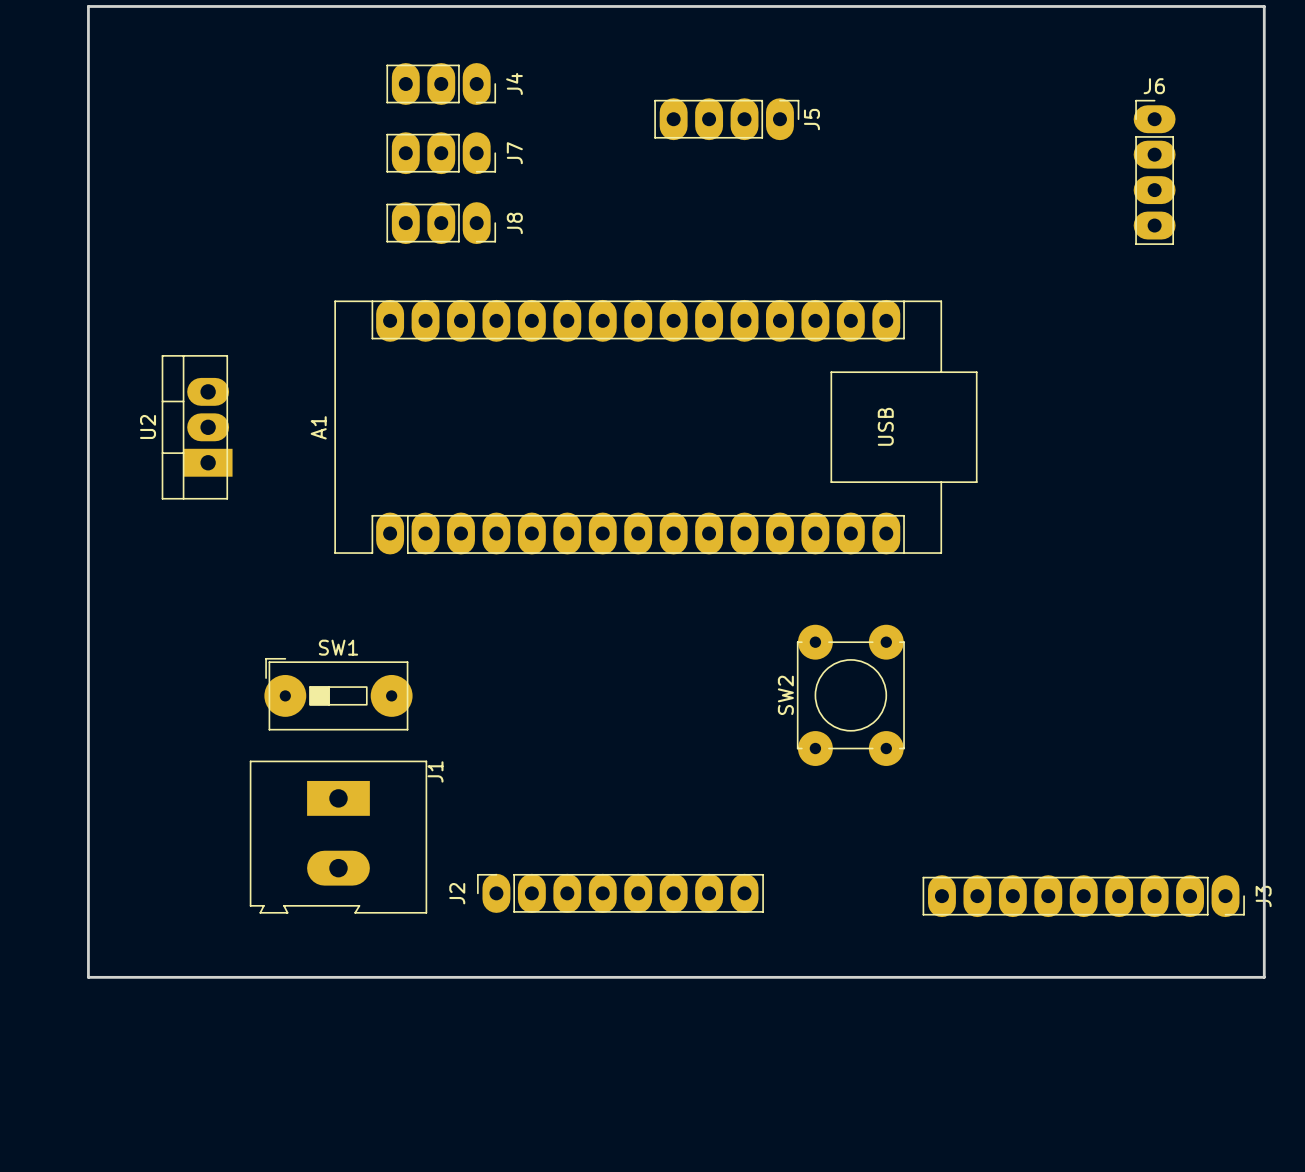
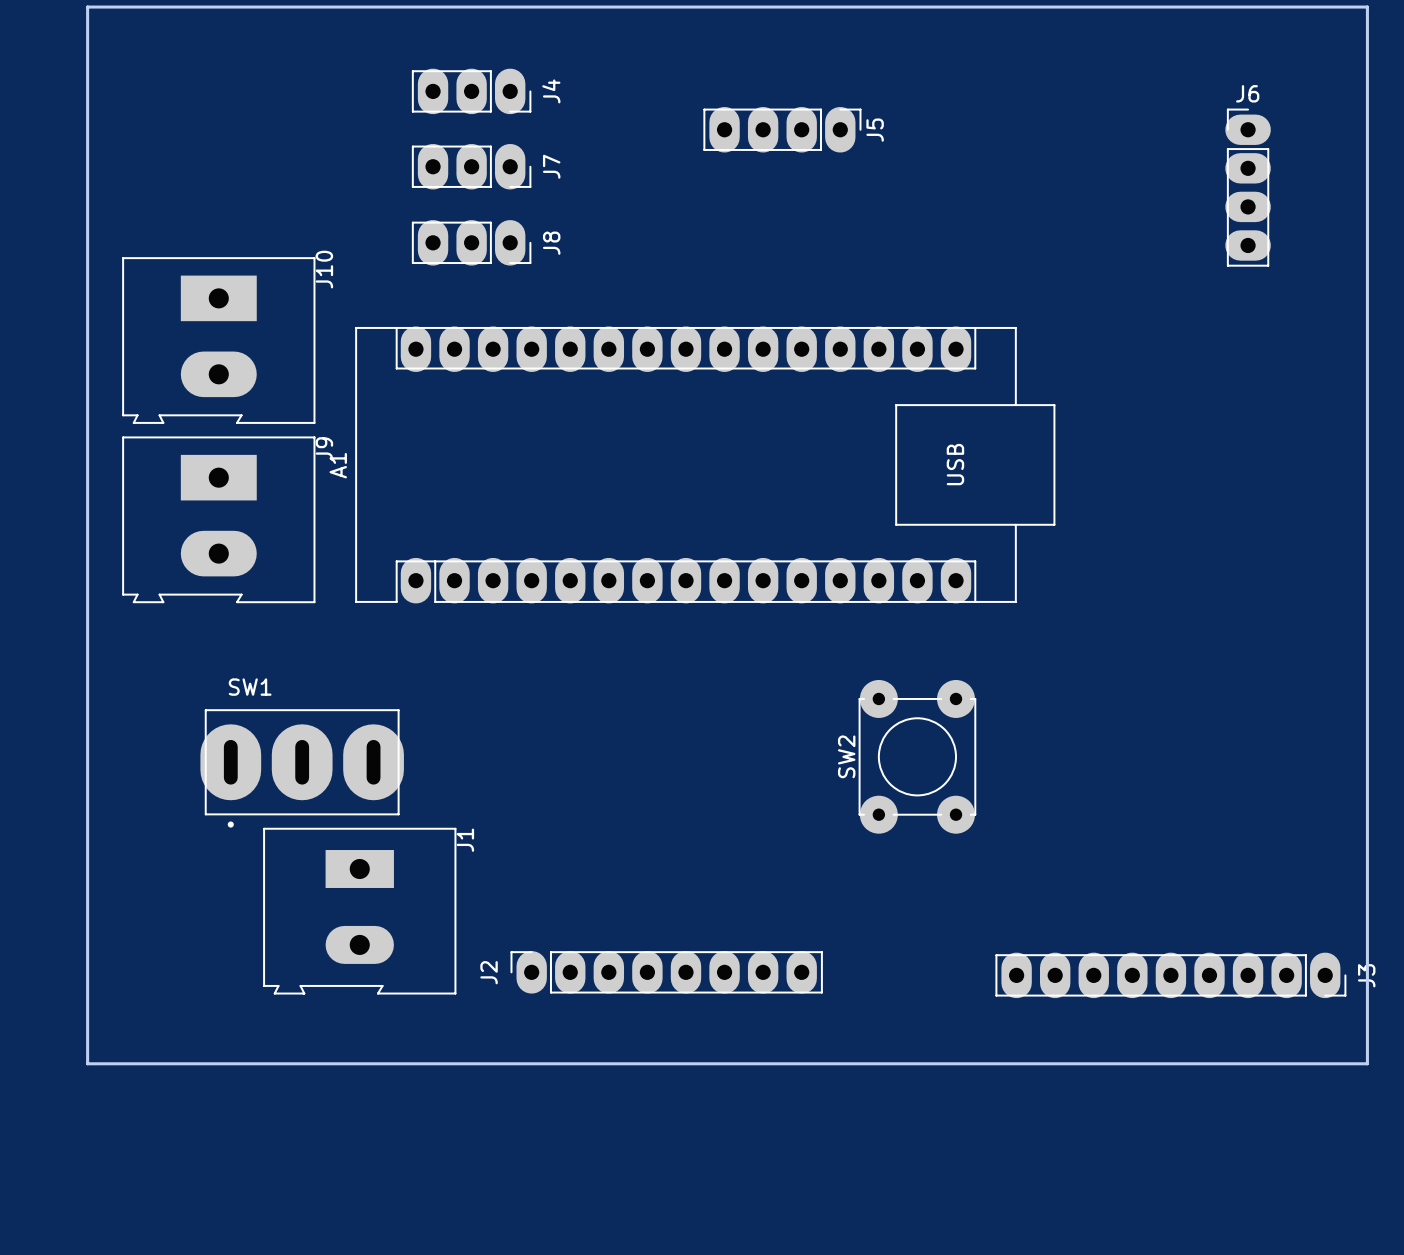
J10: none -> (218, 340)
U2: (197, 427) -> none
J9: none -> (218, 519)
SW1 name position: SW1 (338, 647) -> SW1 (250, 687)
SW1 footprint: [264, 657, 413, 731] -> [200, 709, 404, 828]

